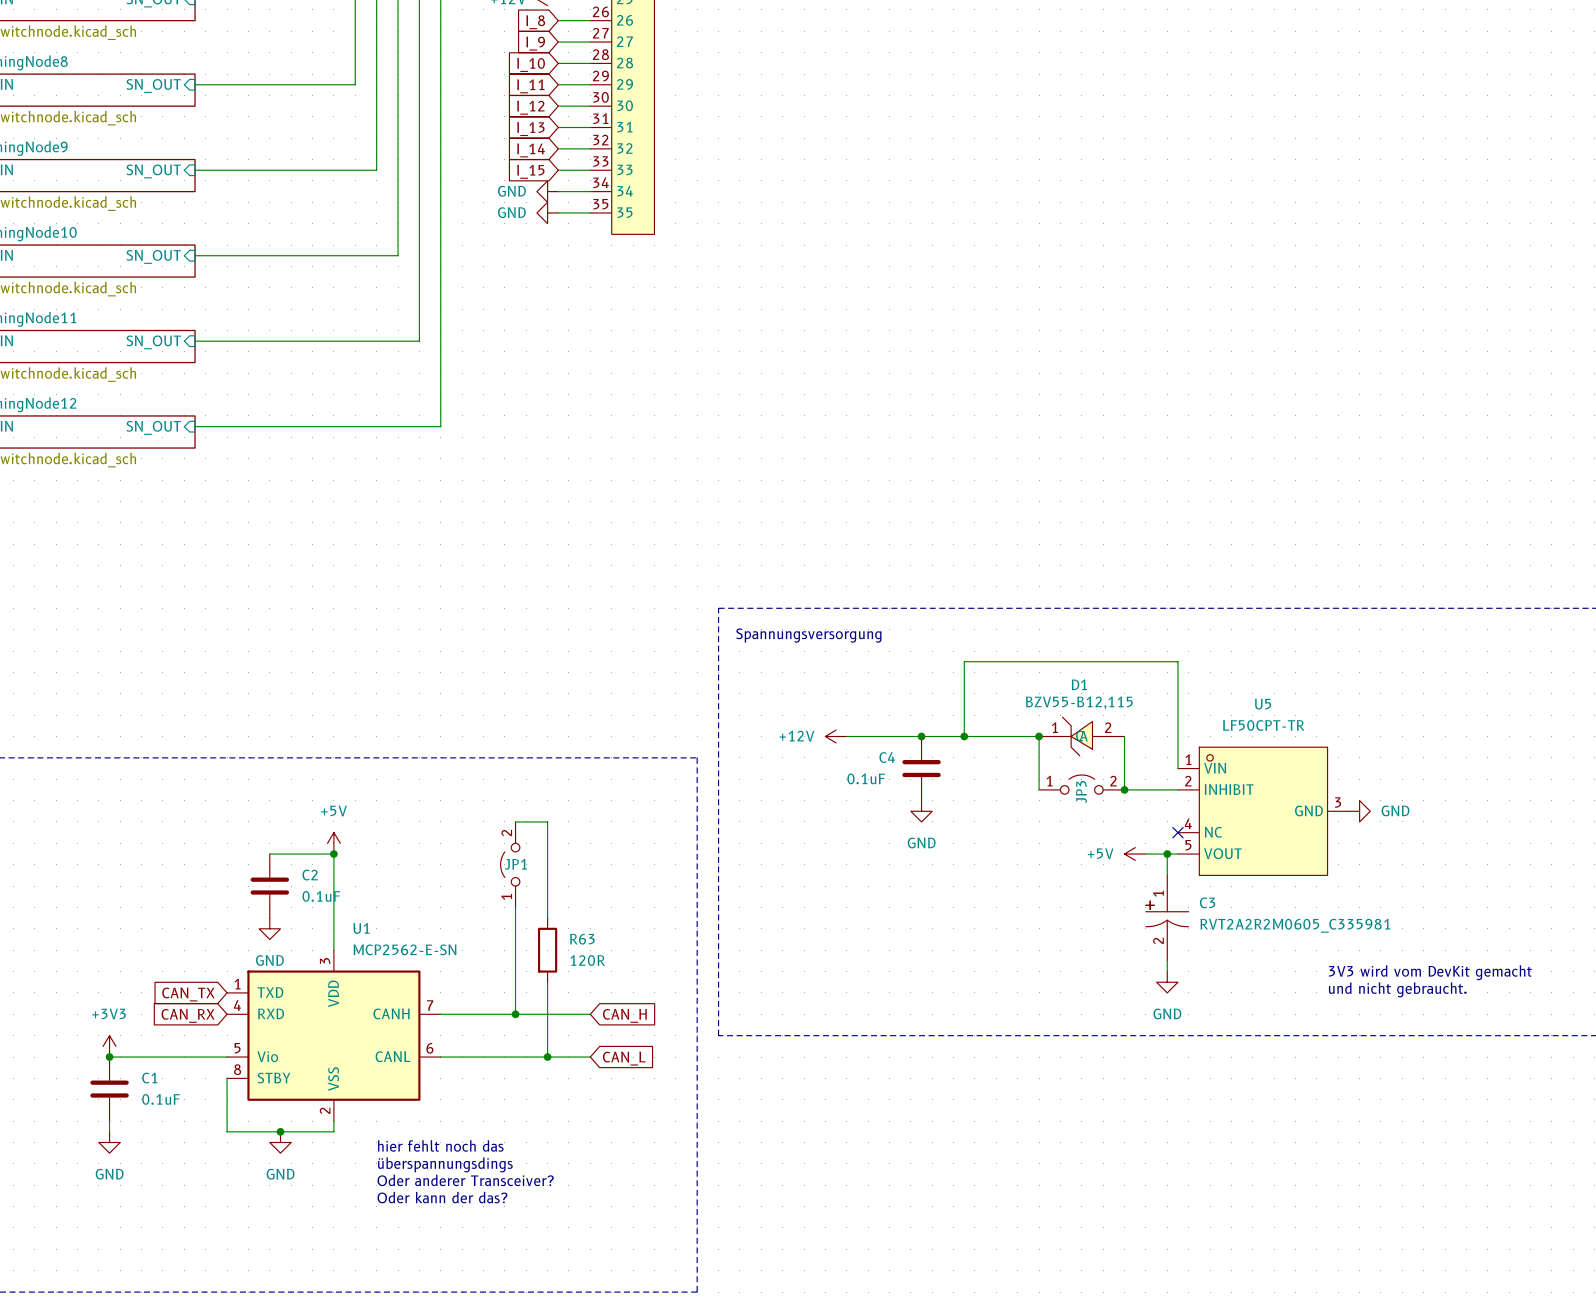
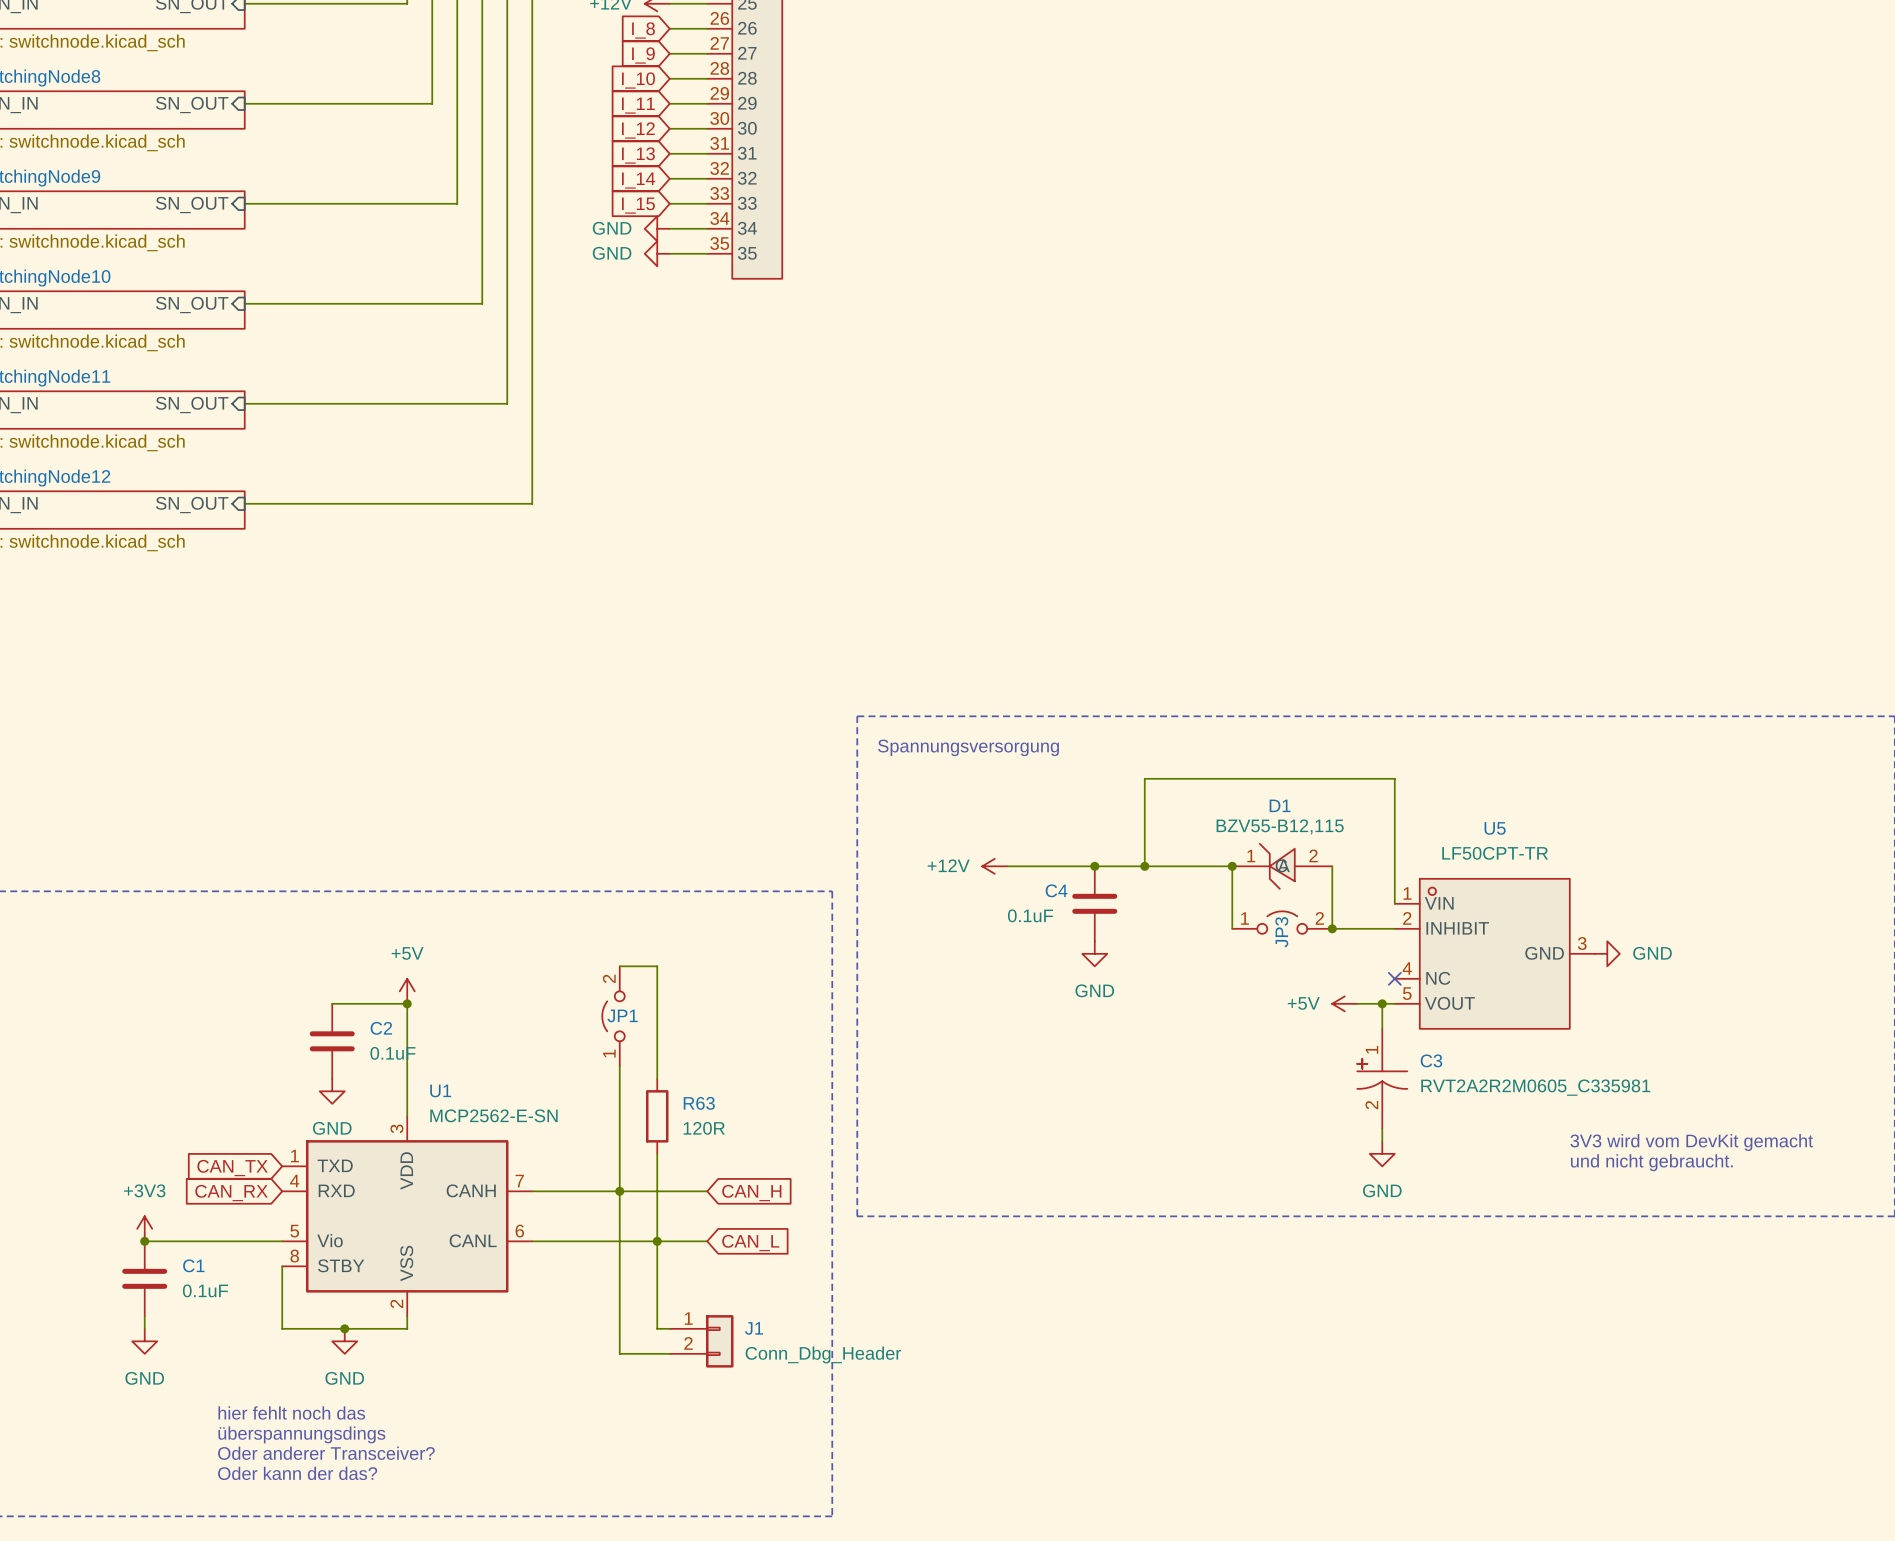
wire: none -> (619, 1191) (619, 1353) (669, 1353)
wire: none -> (657, 1241) (657, 1328) (669, 1328)
J1: none -> Conn_Dbg_Header (701, 1341)
text: hier fehlt noch das (440, 1145) -> none
text: überspannungsdings (445, 1164) -> none
text: Oder anderer Transceiver? (465, 1180) -> none
text: Oder kann der das? (442, 1197) -> none
text: none -> hier fehlt noch das (291, 1412)
text: none -> überspannungsdings (301, 1434)
text: none -> Oder anderer Transceiver? (326, 1453)
text: none -> Oder kann der das? (297, 1473)

